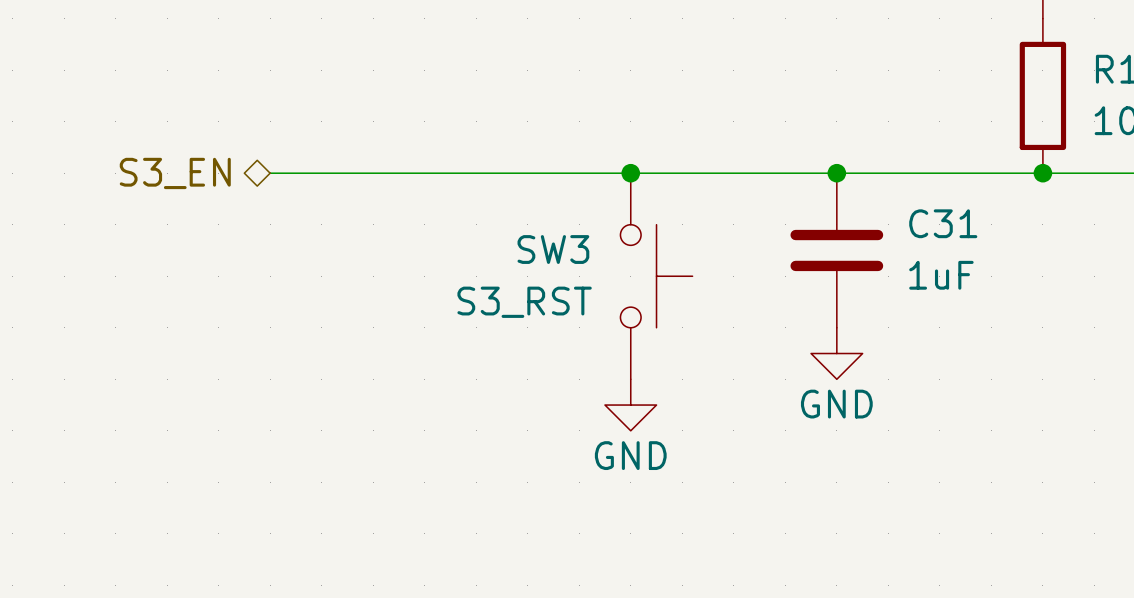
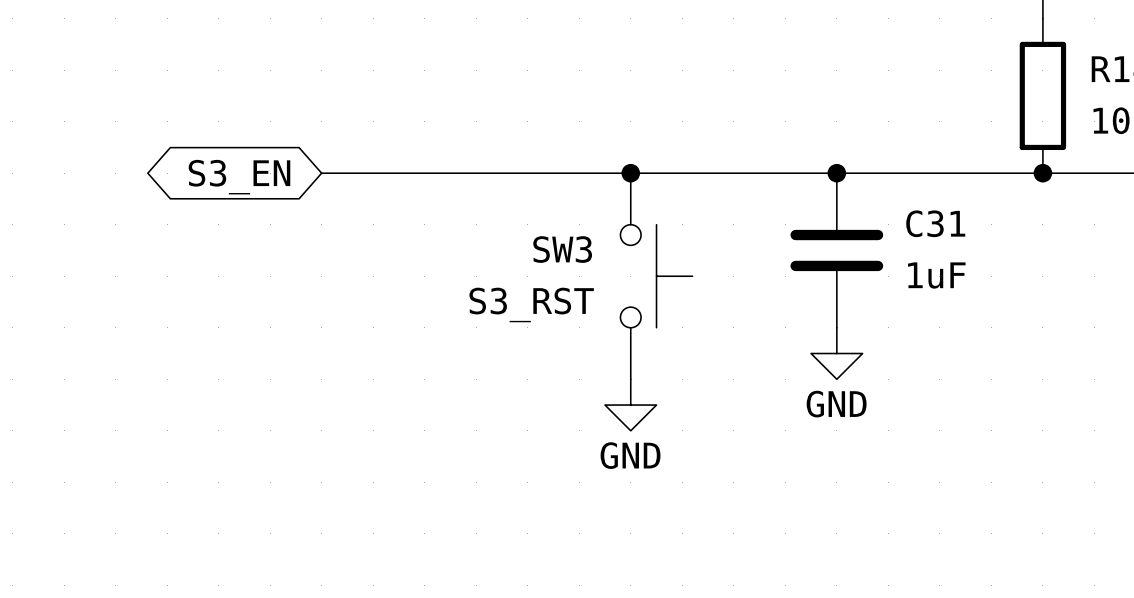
hierarchical label: S3_EN (175, 173) -> none
wire: (270, 173) (321, 173) -> none
global label: none -> S3_EN (239, 177)

